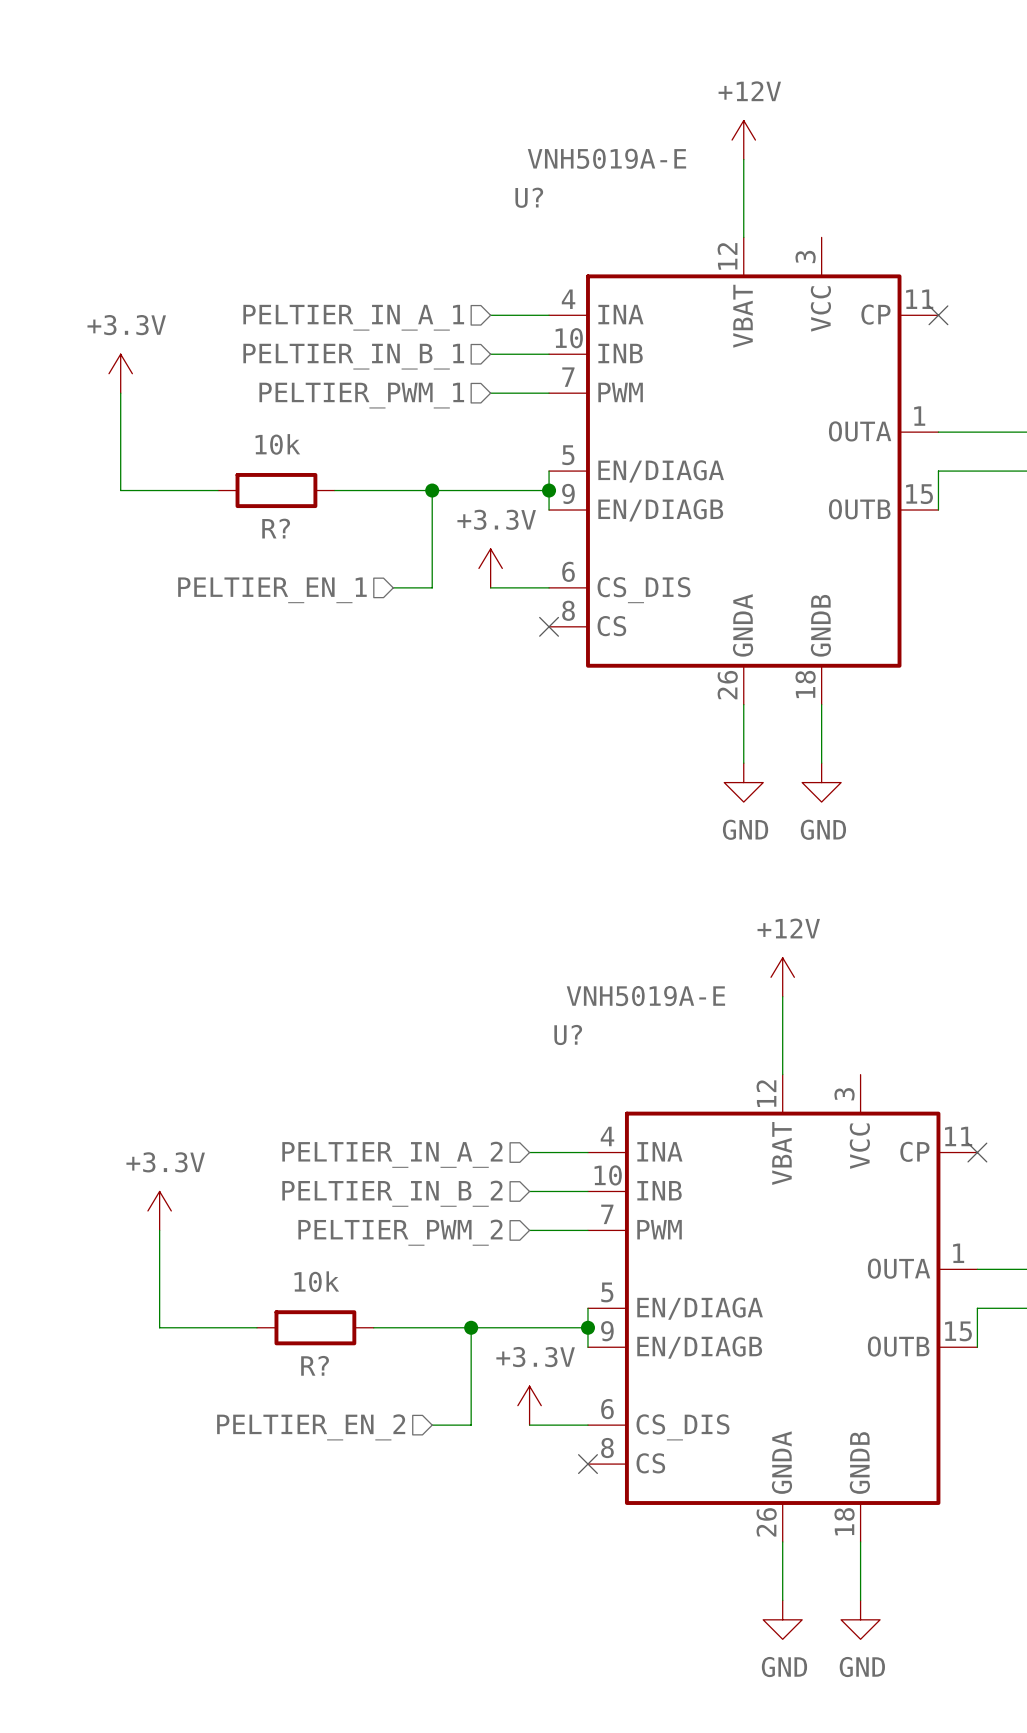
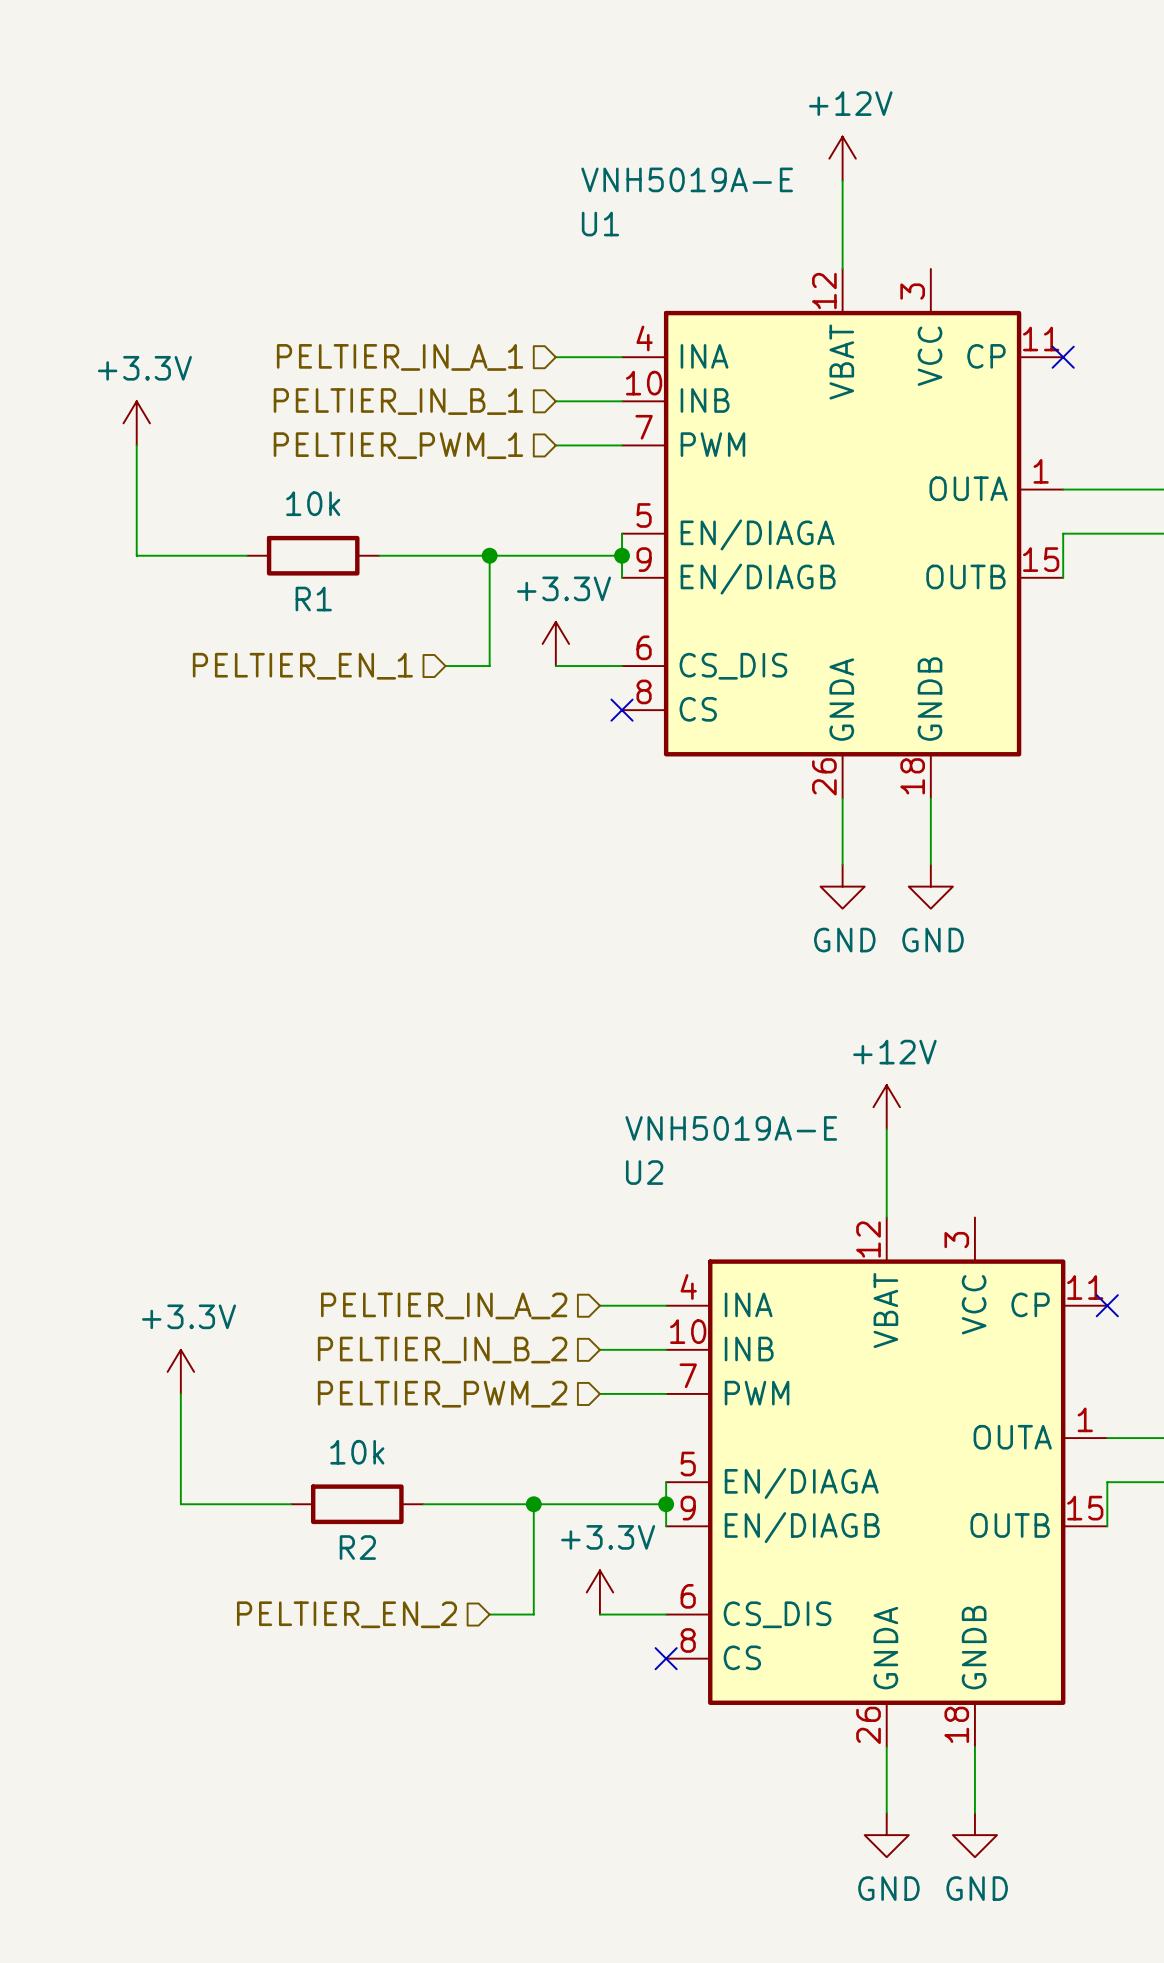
U? name: U? (529, 197) -> U1 (600, 224)
R? name: R? (276, 528) -> R1 (313, 599)
U? name: U? (568, 1035) -> U2 (644, 1172)
R? name: R? (315, 1365) -> R2 (357, 1547)

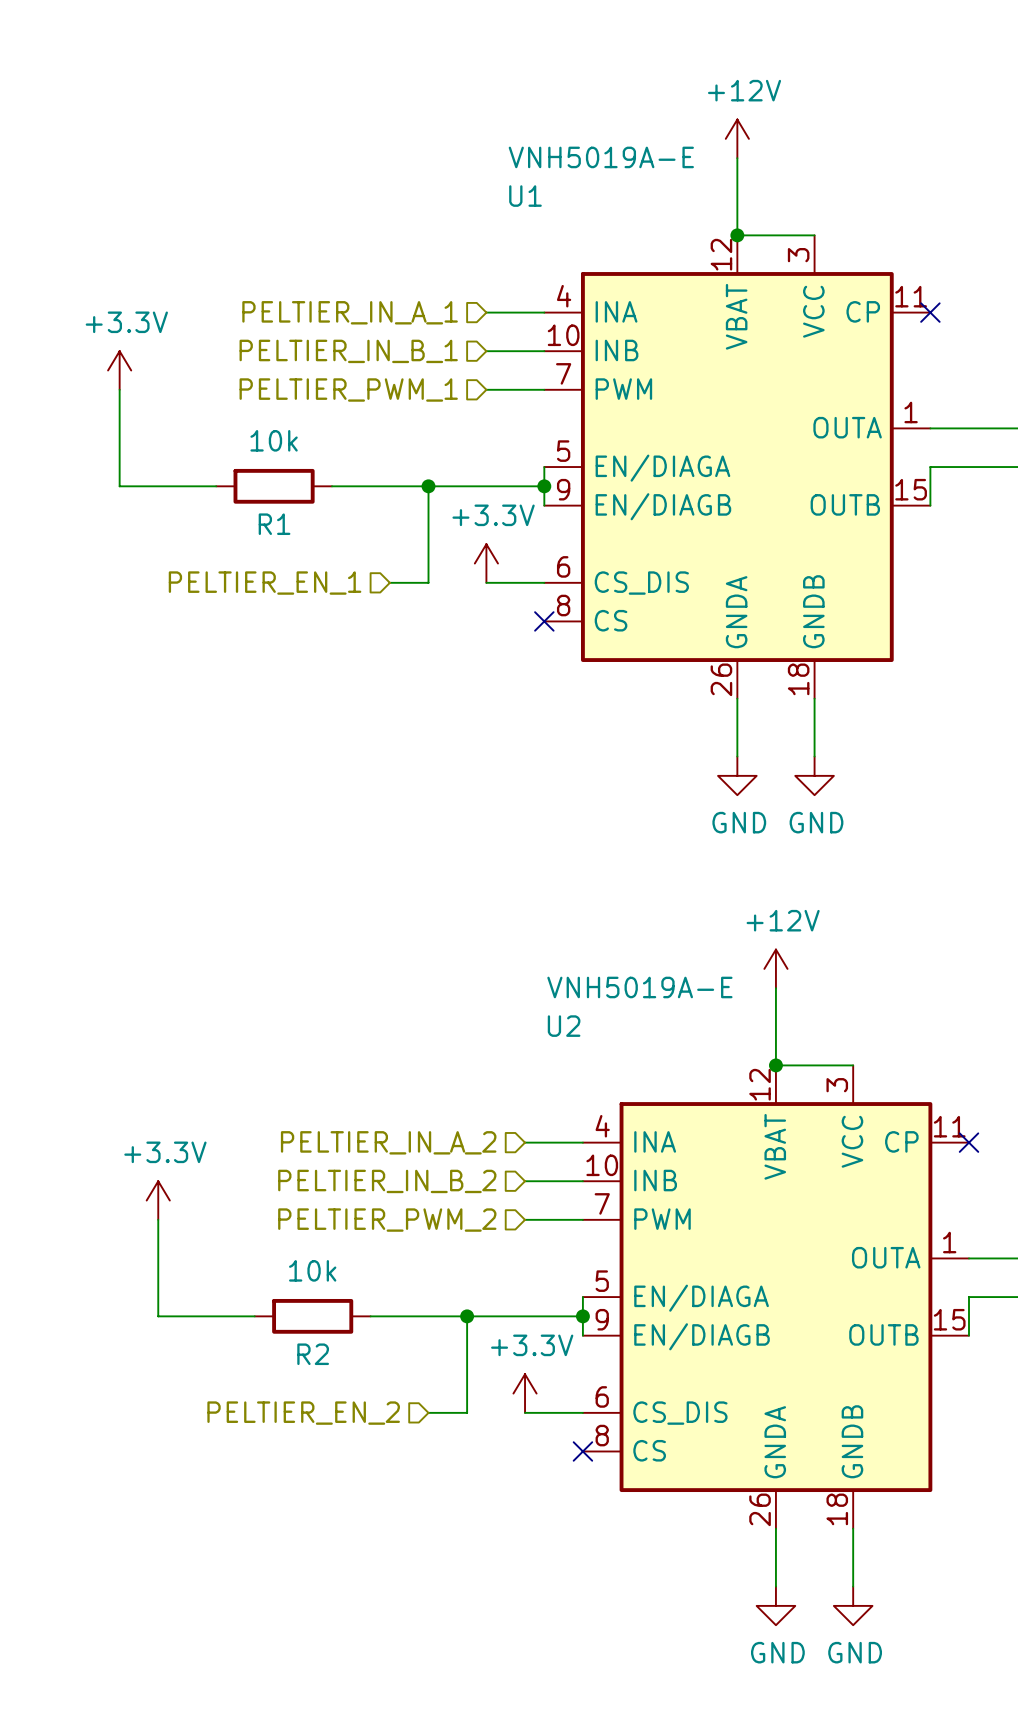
wire: none -> (737, 235) (814, 235)
junction: none -> (737, 235)
wire: none -> (775, 1065) (853, 1065)
junction: none -> (775, 1065)

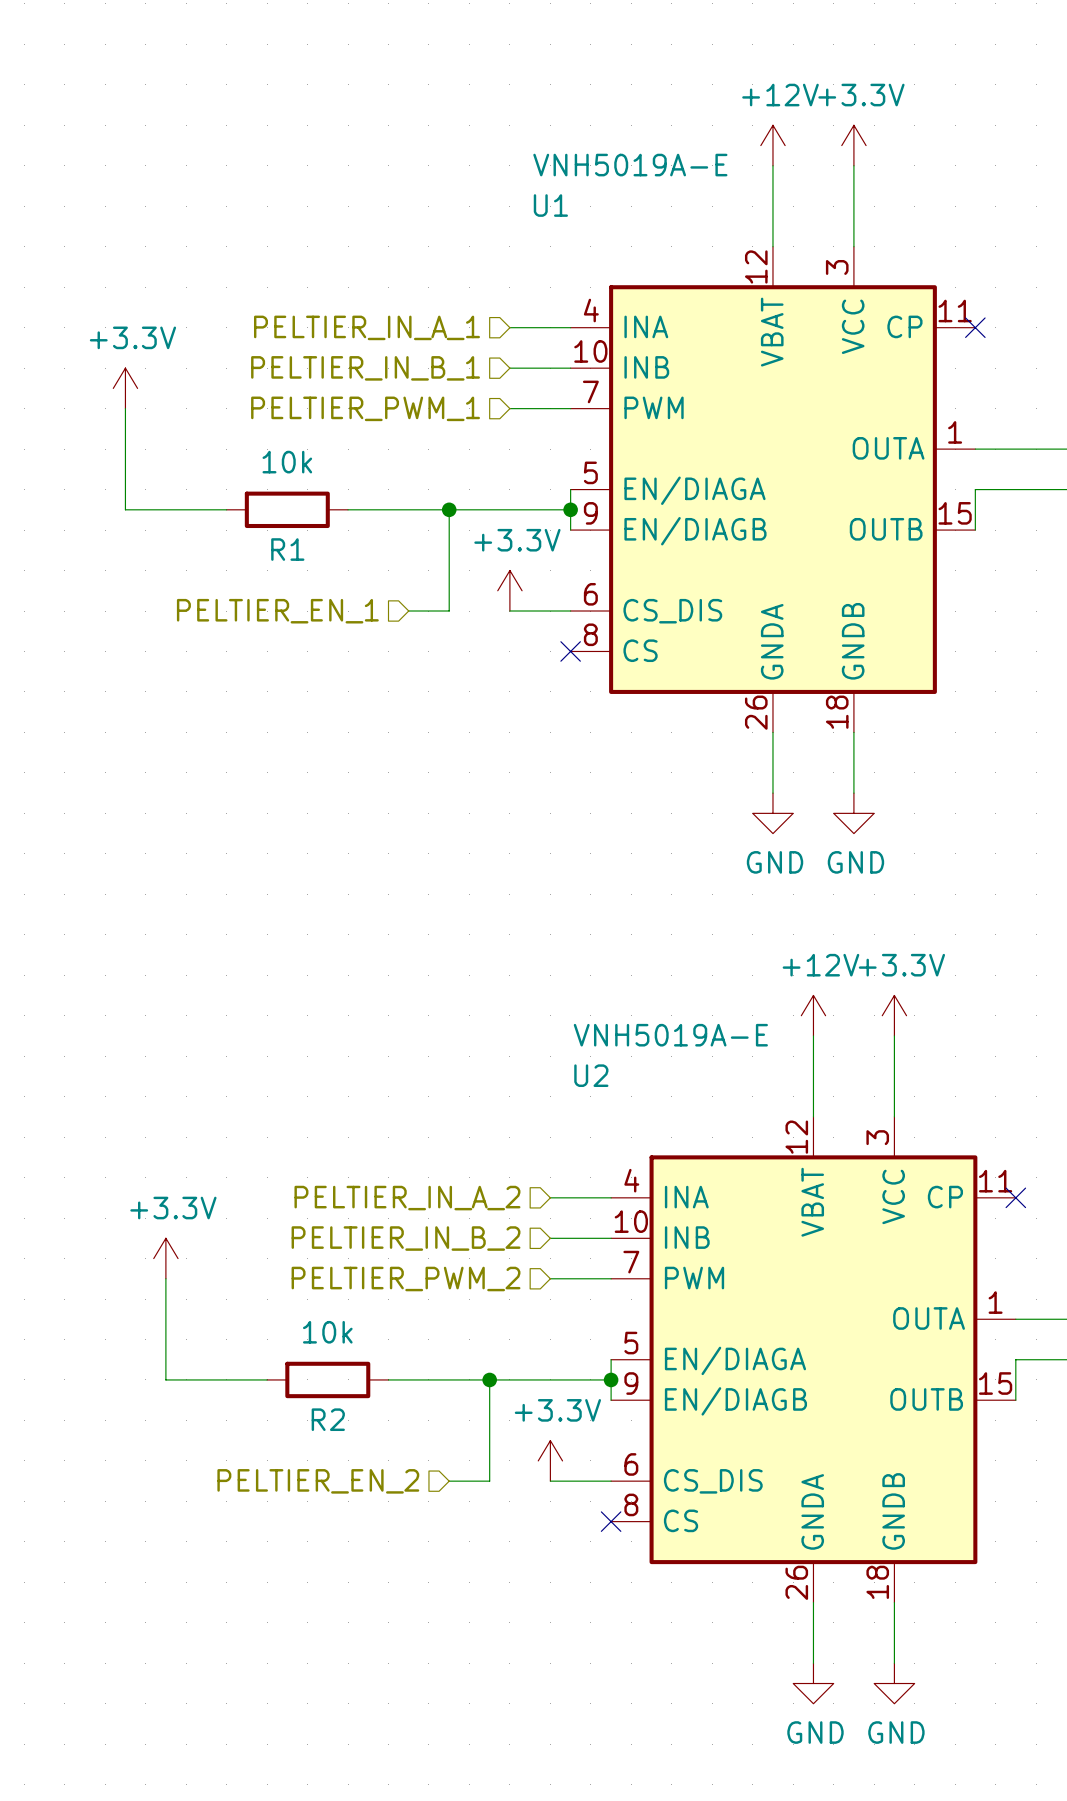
power symbol: none -> +3.3V (853, 145)
wire: (737, 235) (814, 235) -> (853, 165) (853, 246)
junction: (737, 235) -> none
power symbol: none -> +3.3V (894, 1015)
wire: (775, 1065) (853, 1065) -> (894, 1035) (894, 1116)
junction: (775, 1065) -> none

